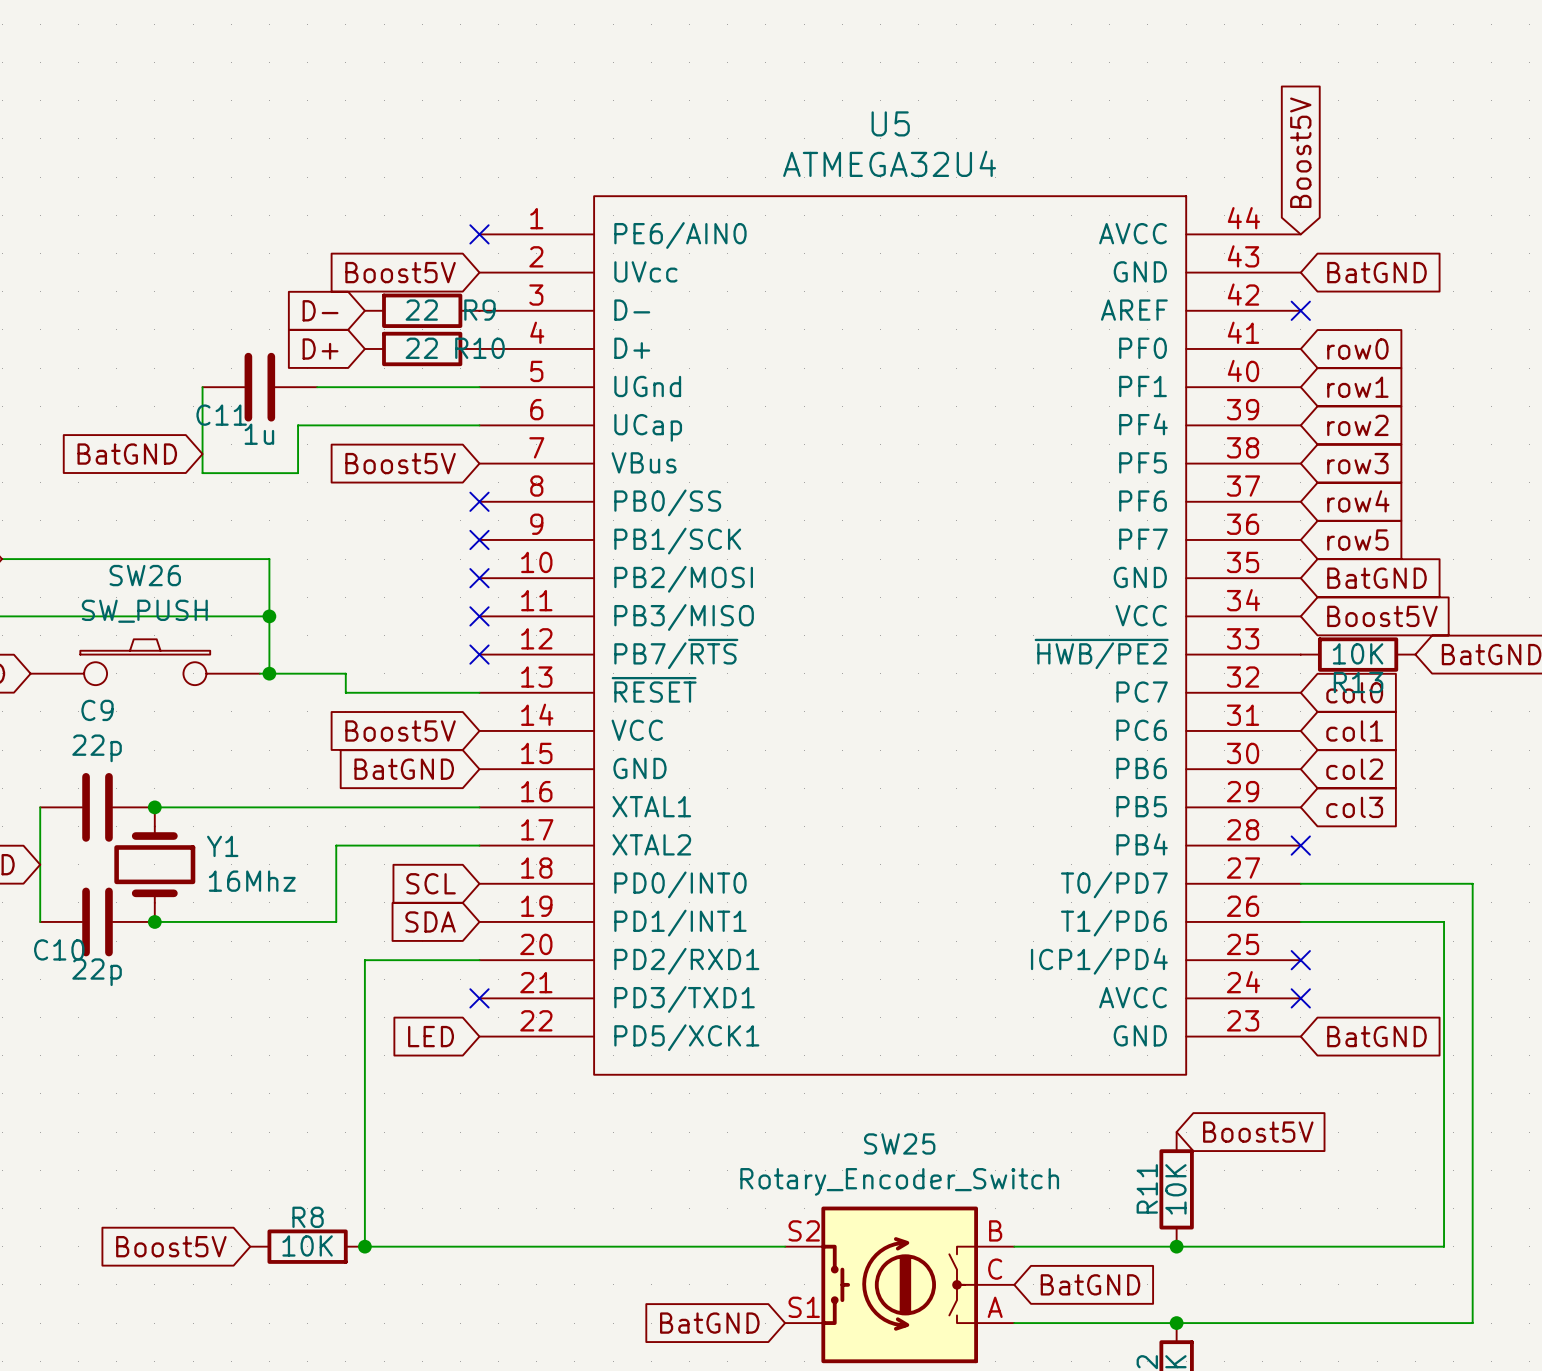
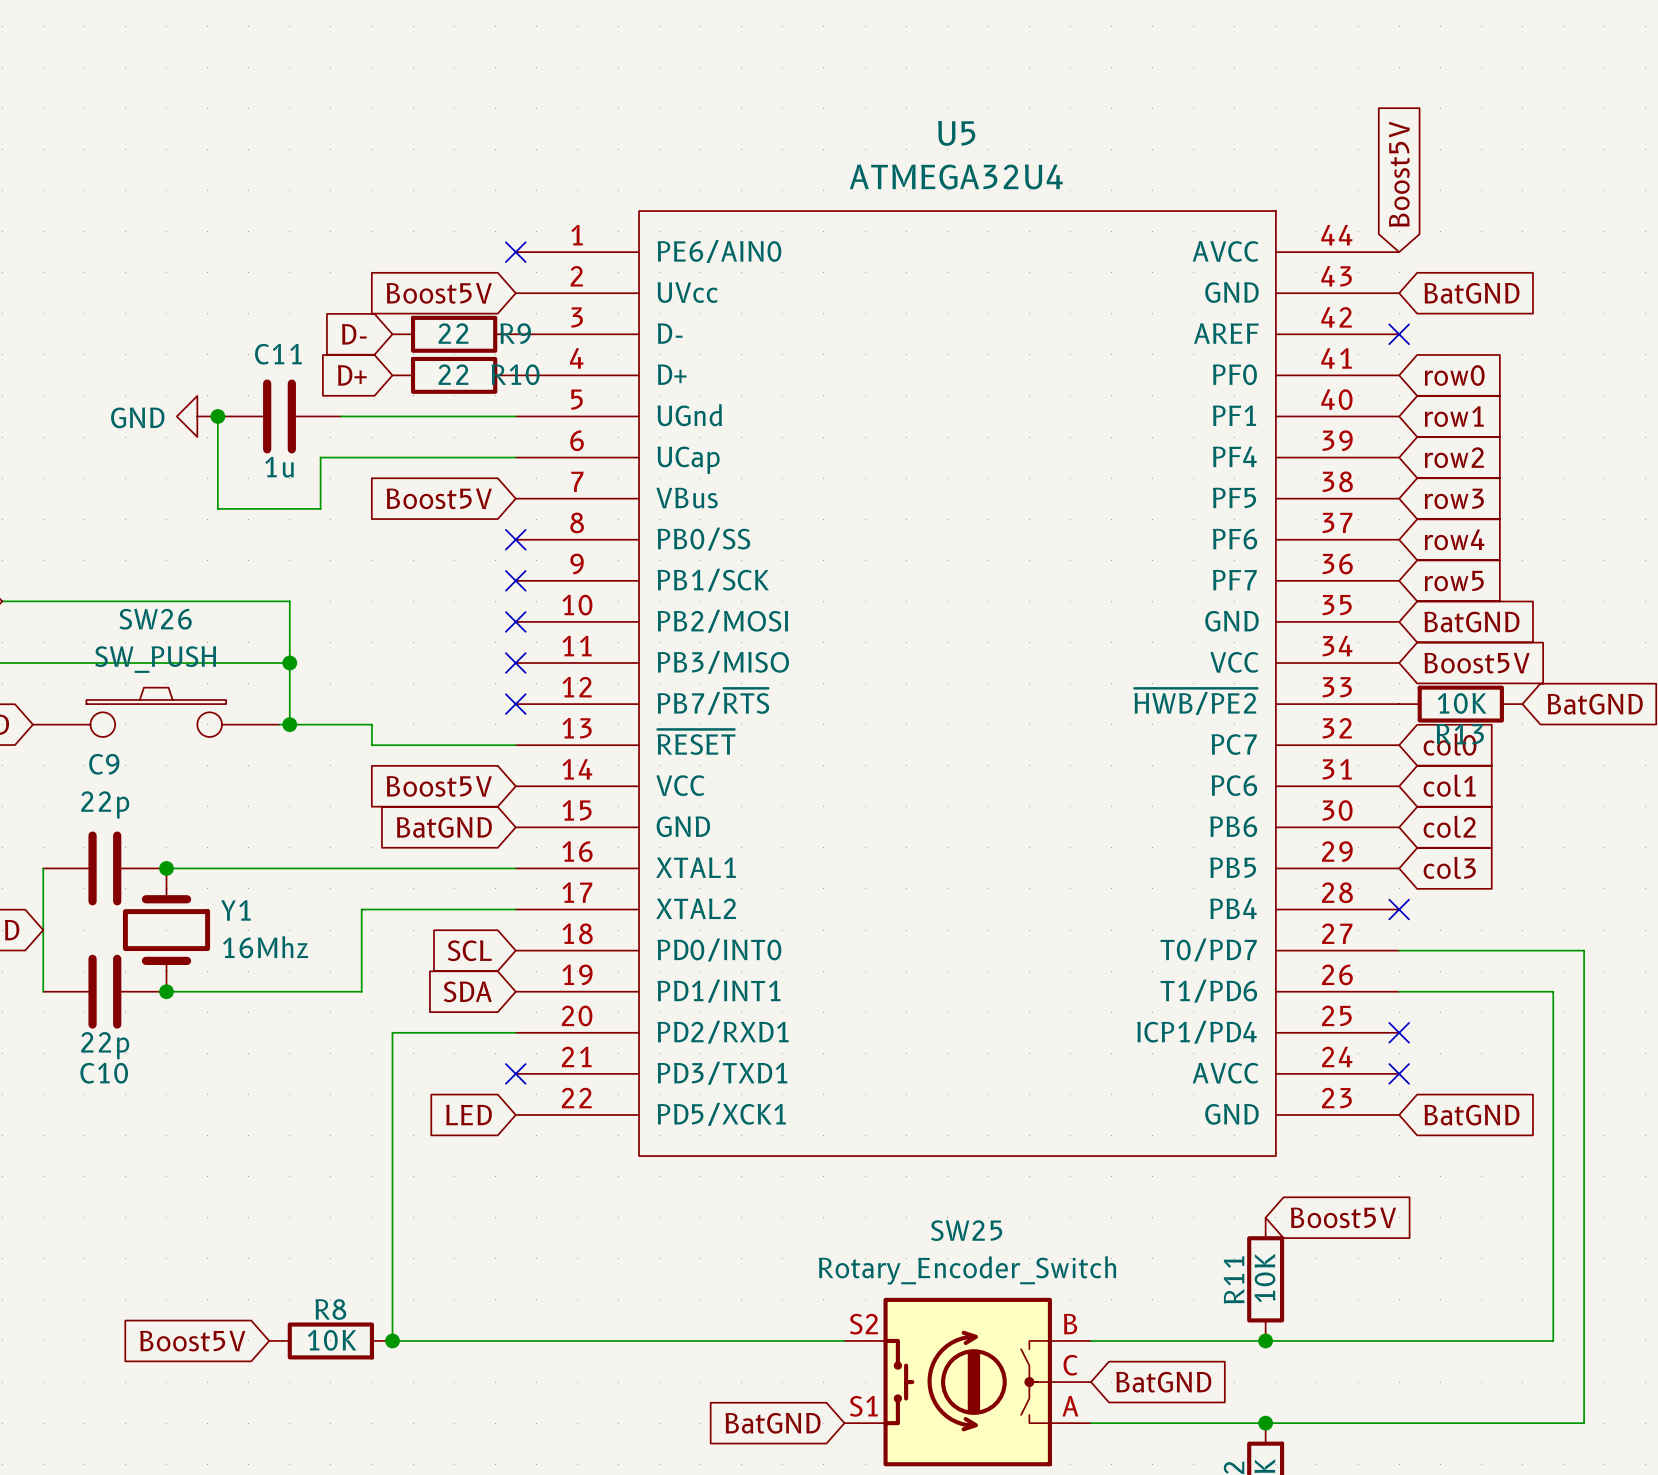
power symbol: none -> GND (197, 416)
junction: none -> (217, 416)
C11 name position: C11 (221, 415) -> C11 (278, 354)
global label: BatGND (127, 454) -> none
C10 name position: C10 (59, 949) -> C10 (104, 1073)

